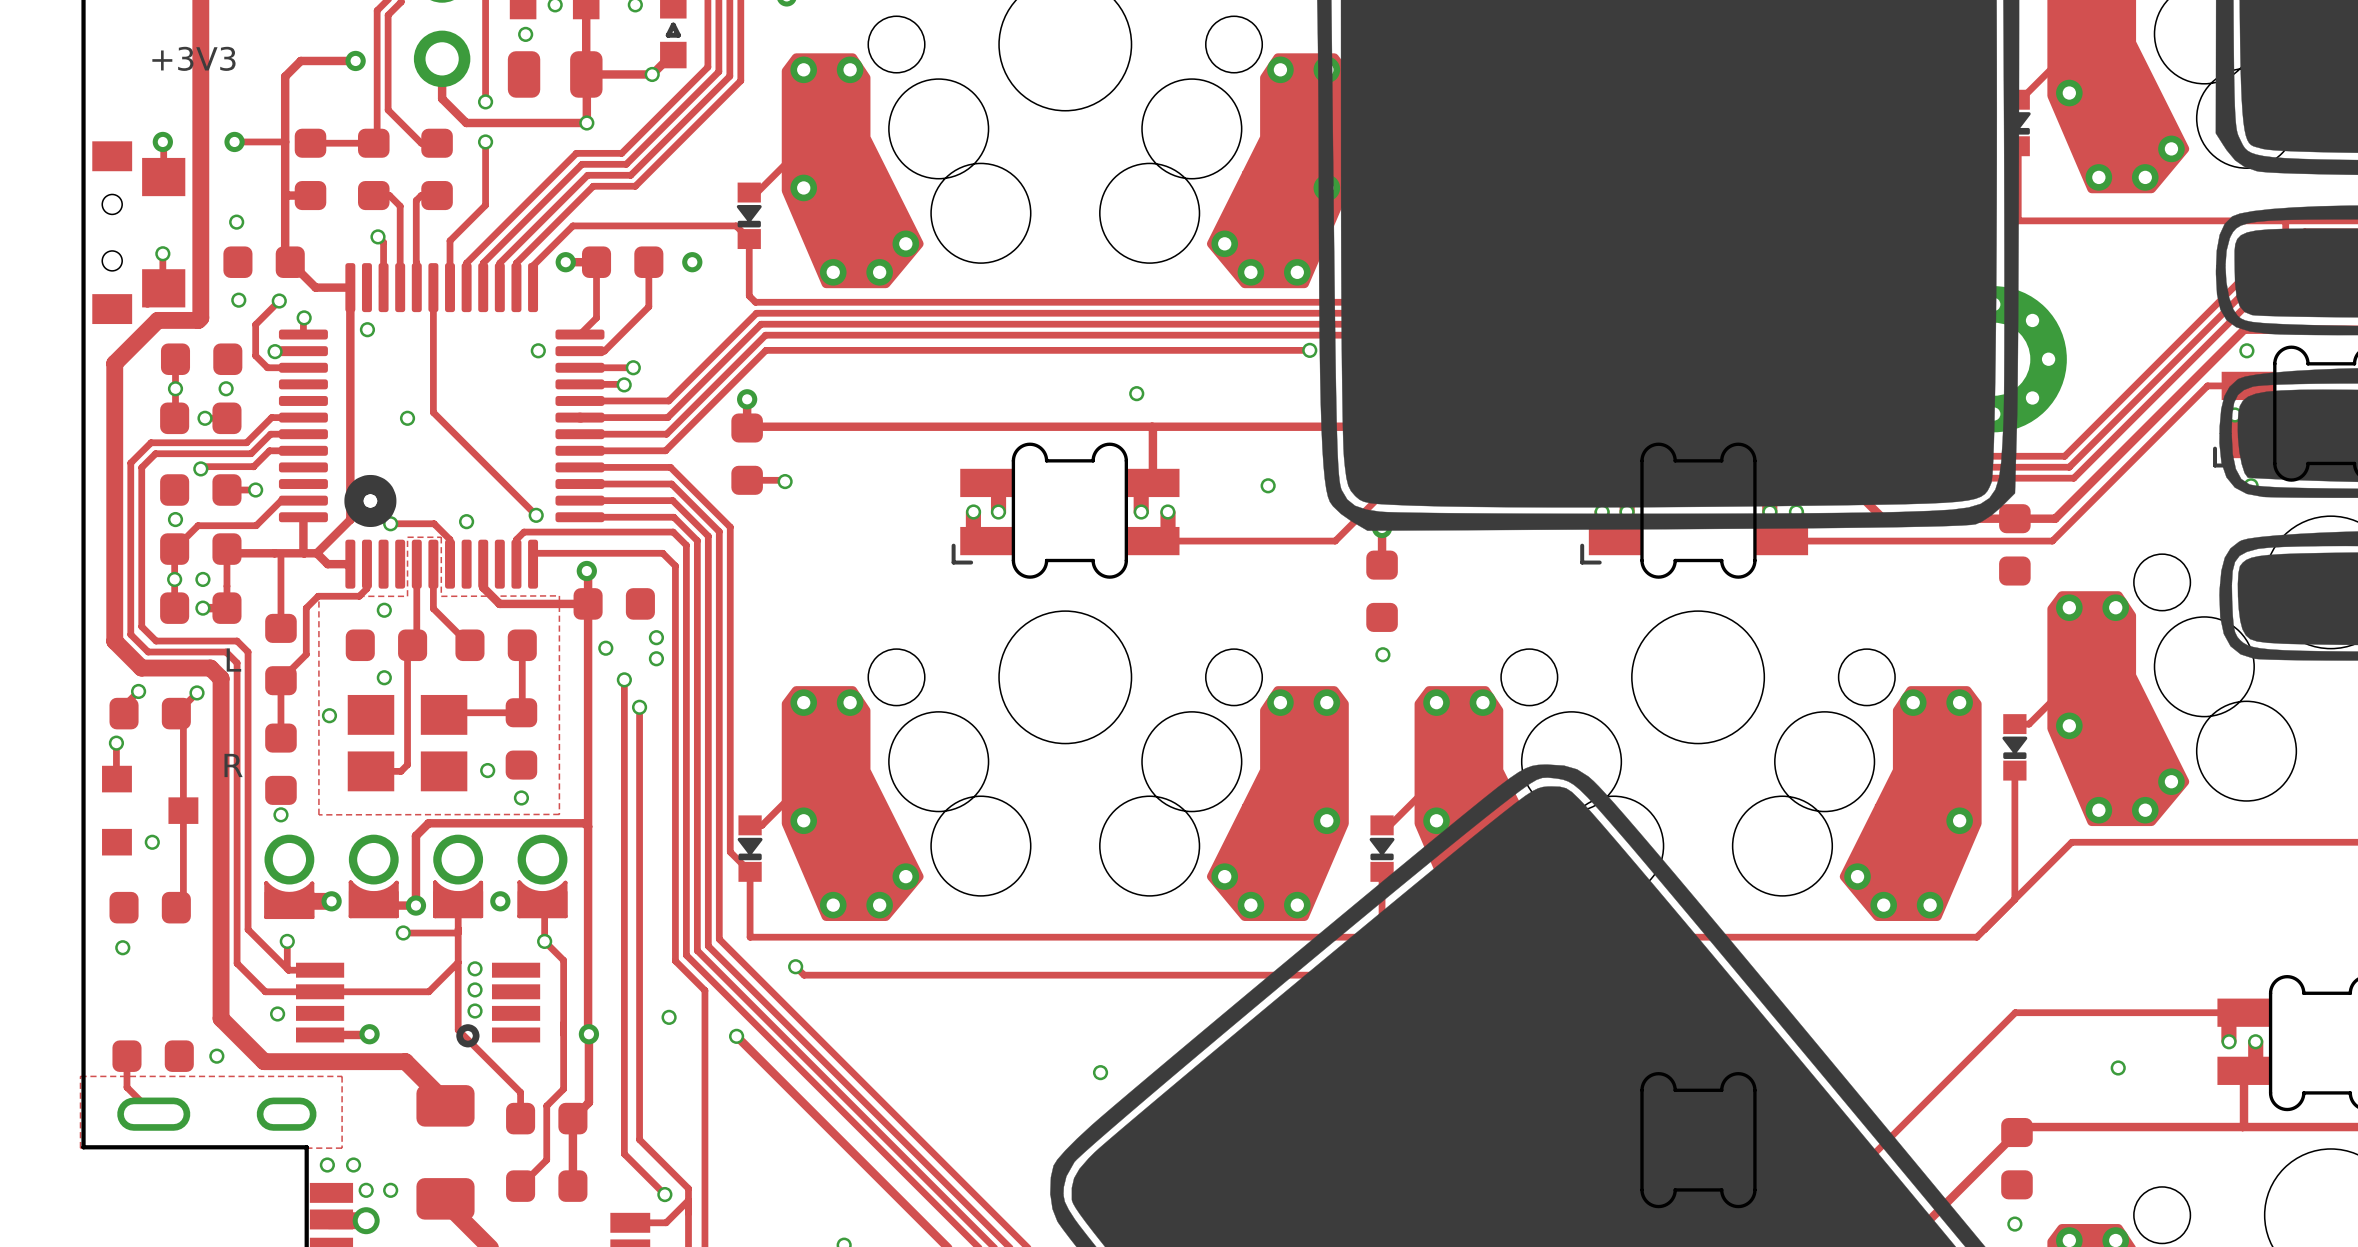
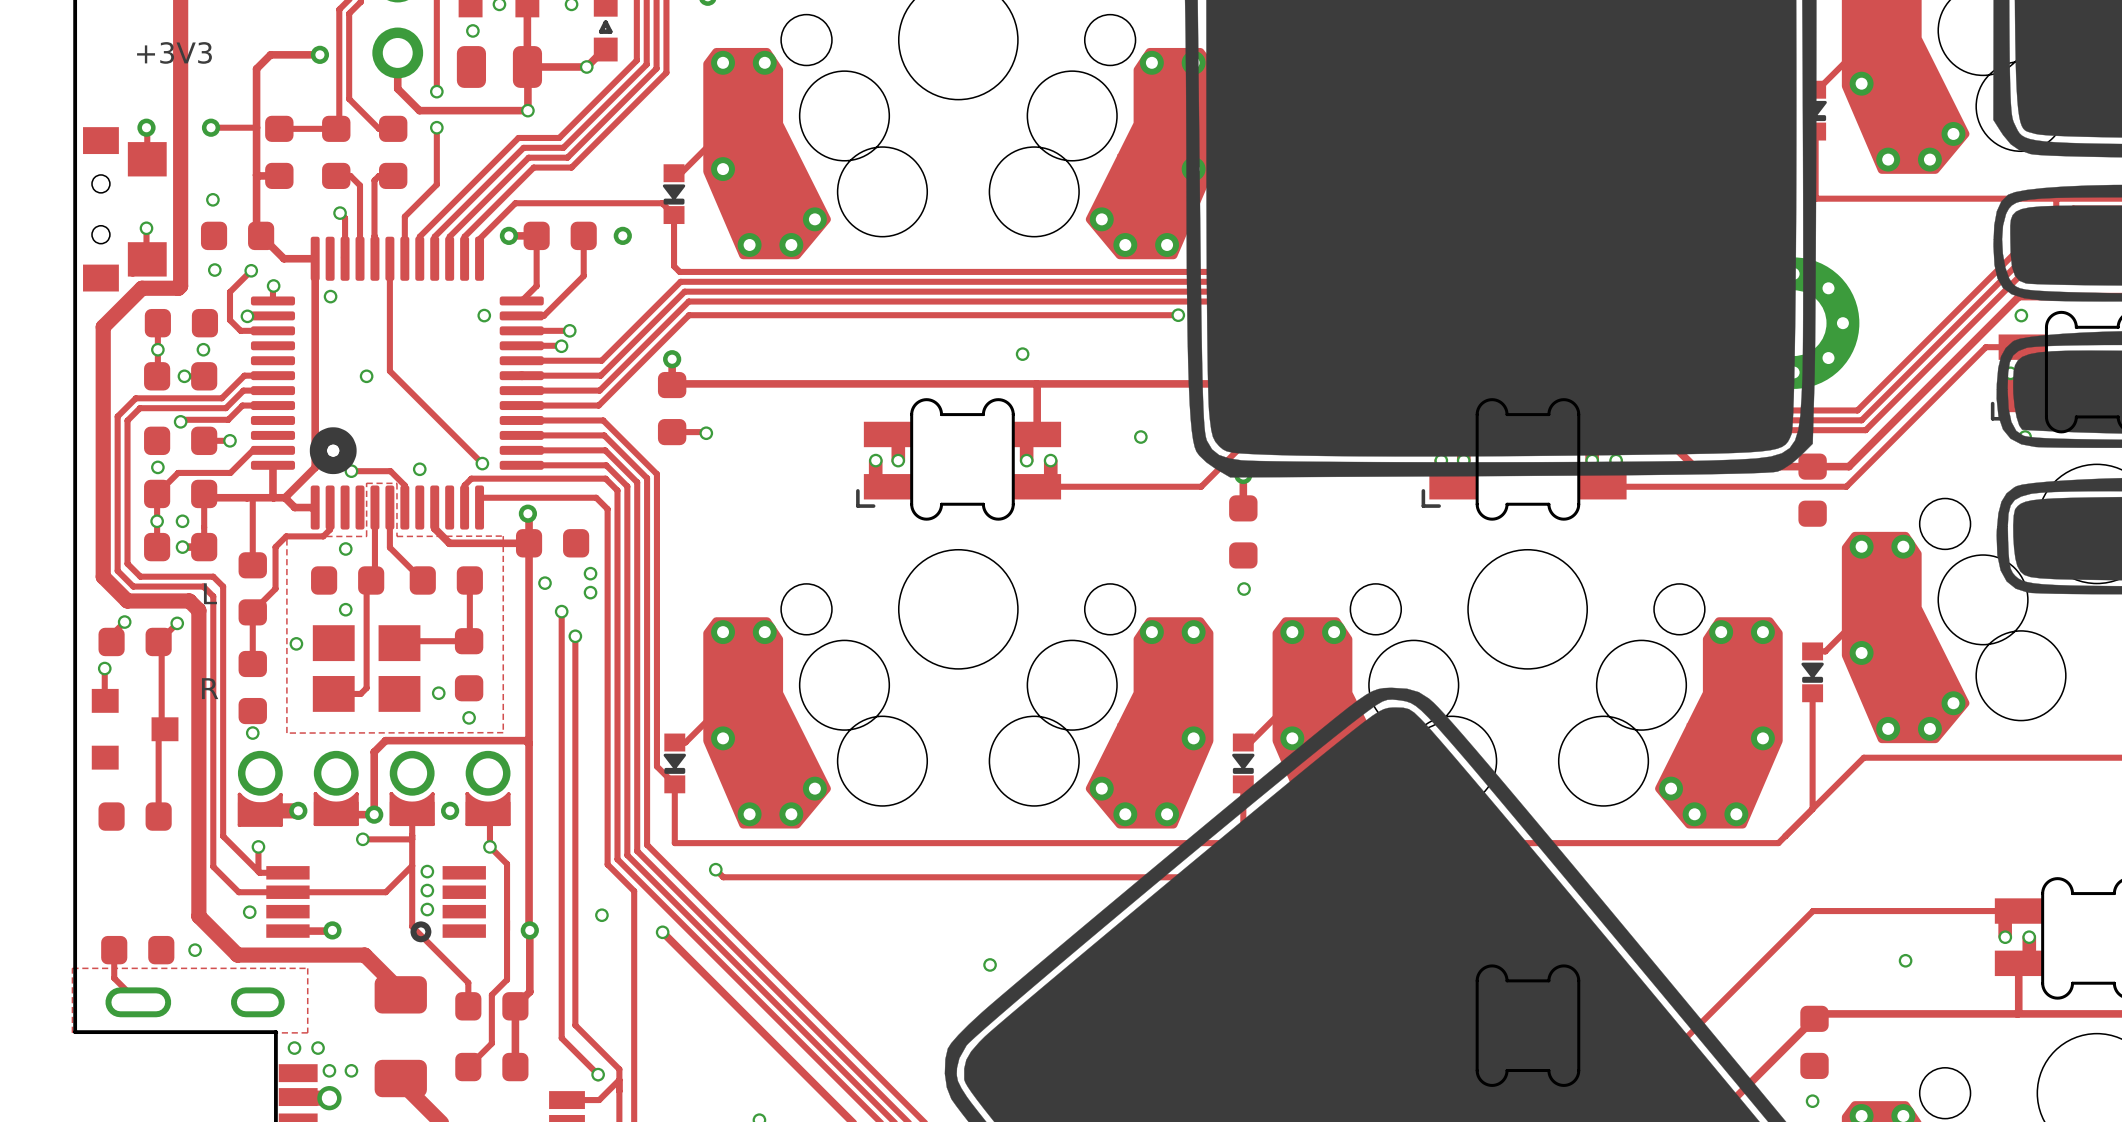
track: (179, 716) (183, 720) (183, 900) (176, 907) -> (161, 645) (161, 729)
track: none -> (158, 732) (158, 816)
via: (152, 842) -> none
via: (122, 947) -> none

